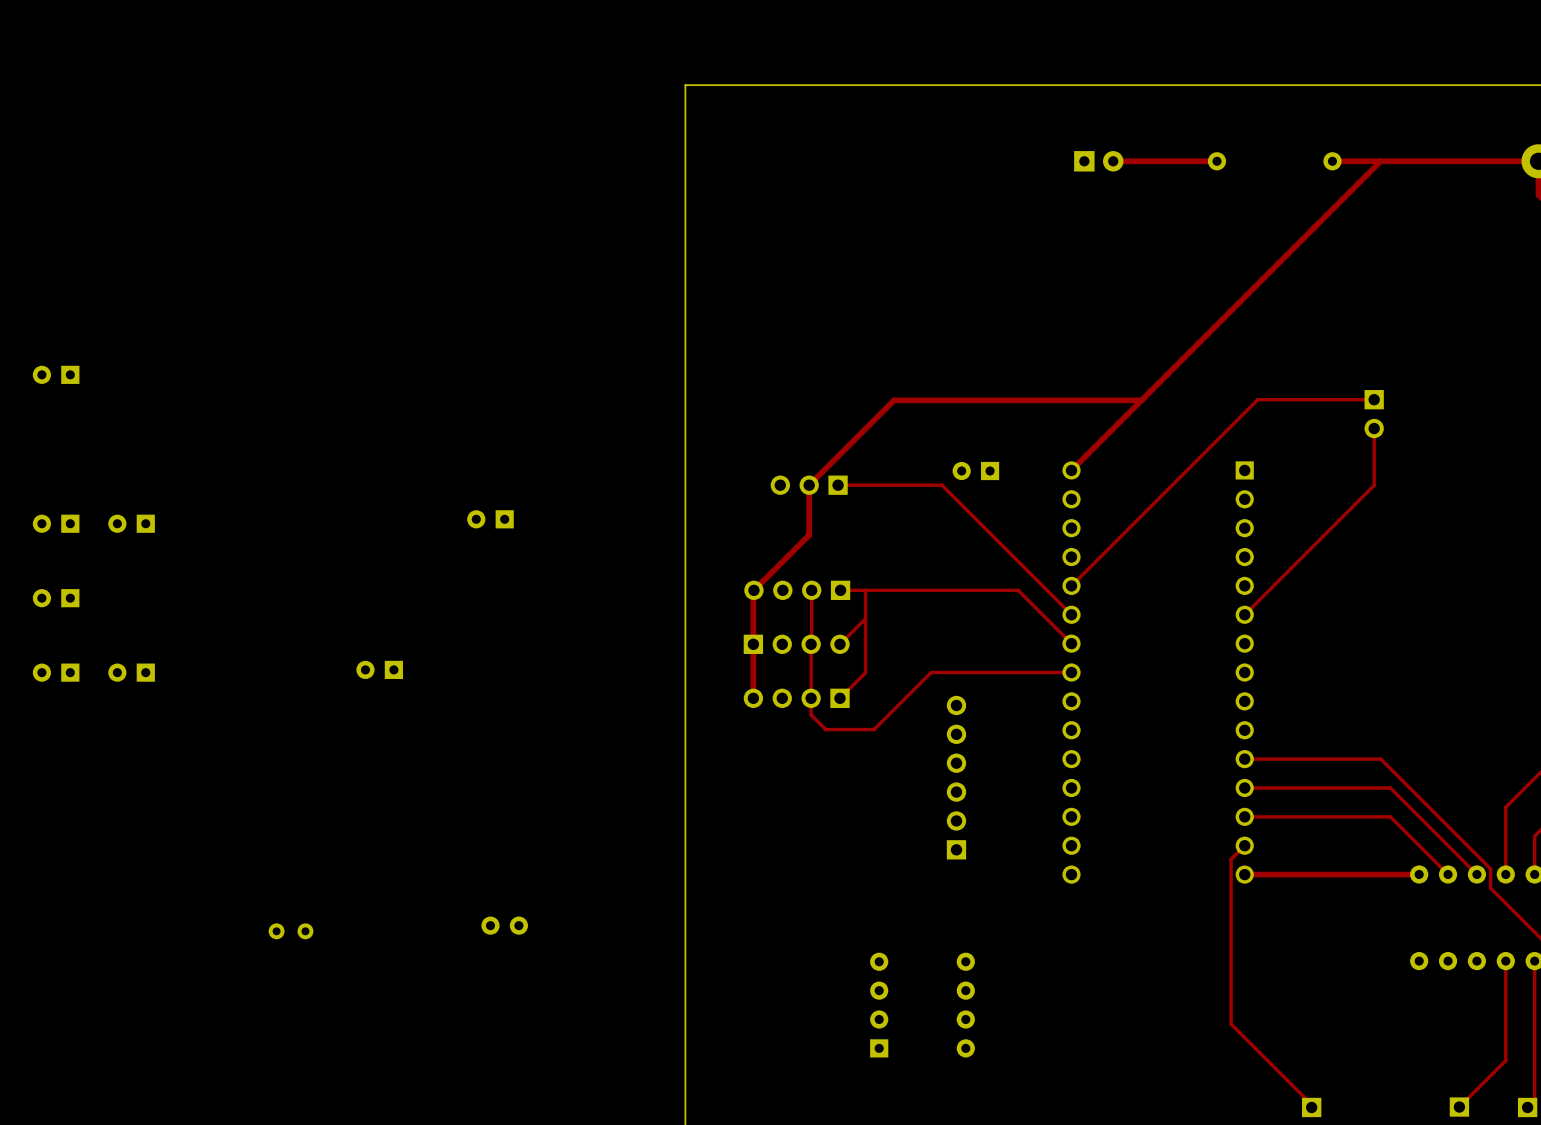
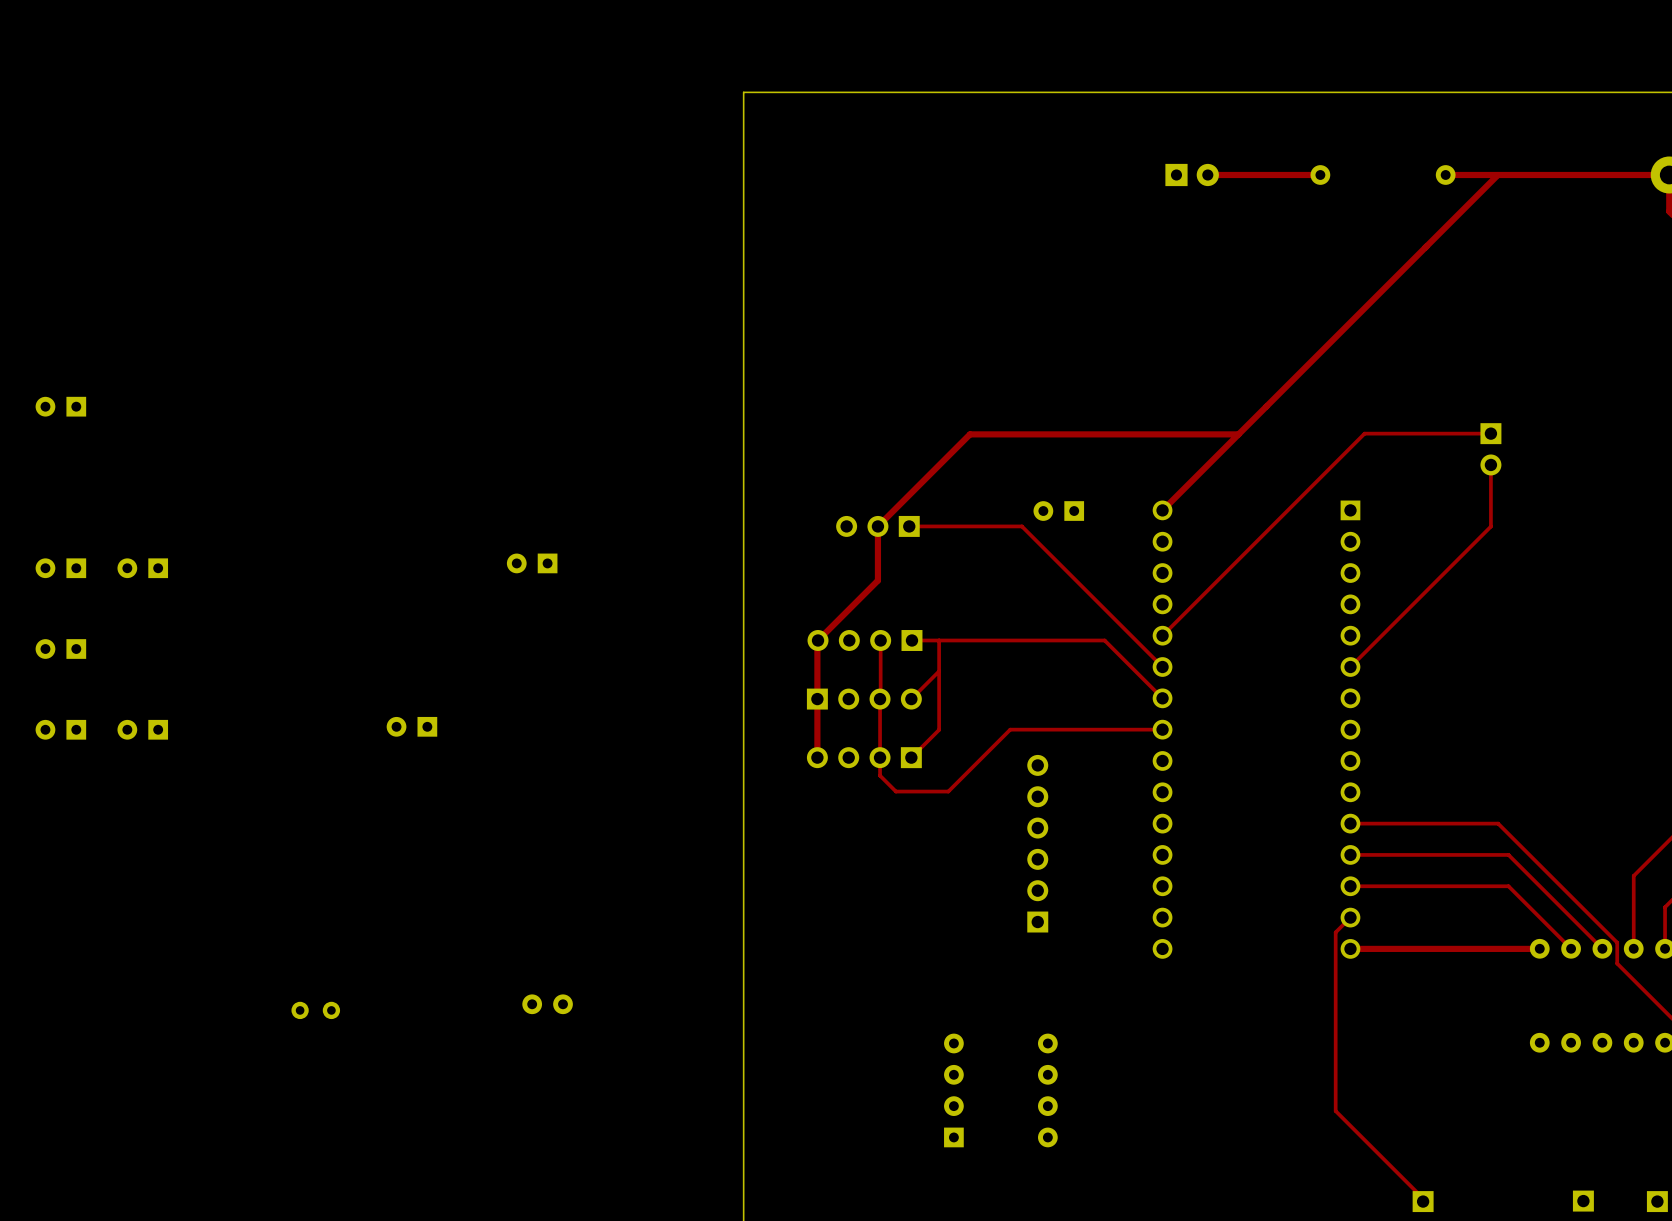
top track: (1505, 961) (1505, 1060) (1459, 1107) -> none
top track: (1534, 961) (1534, 1100) (1527, 1107) -> none

